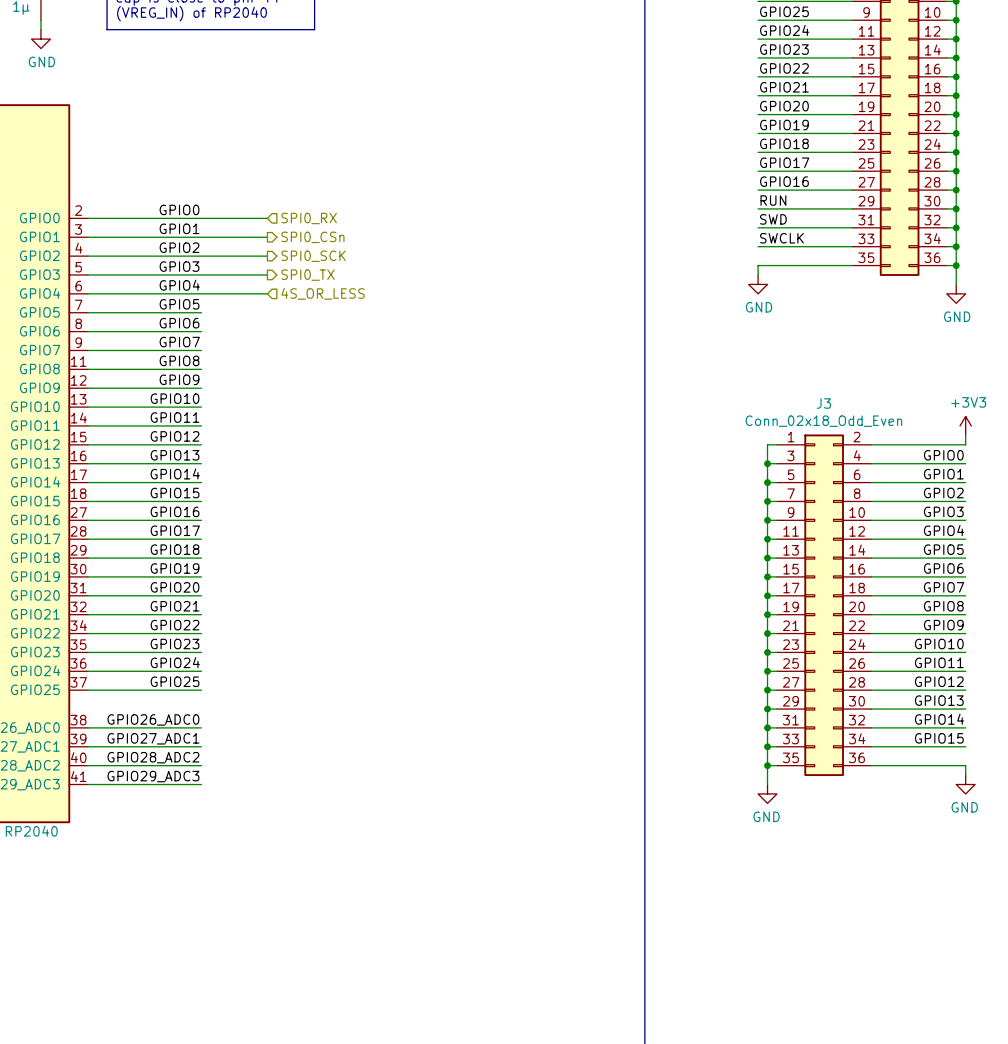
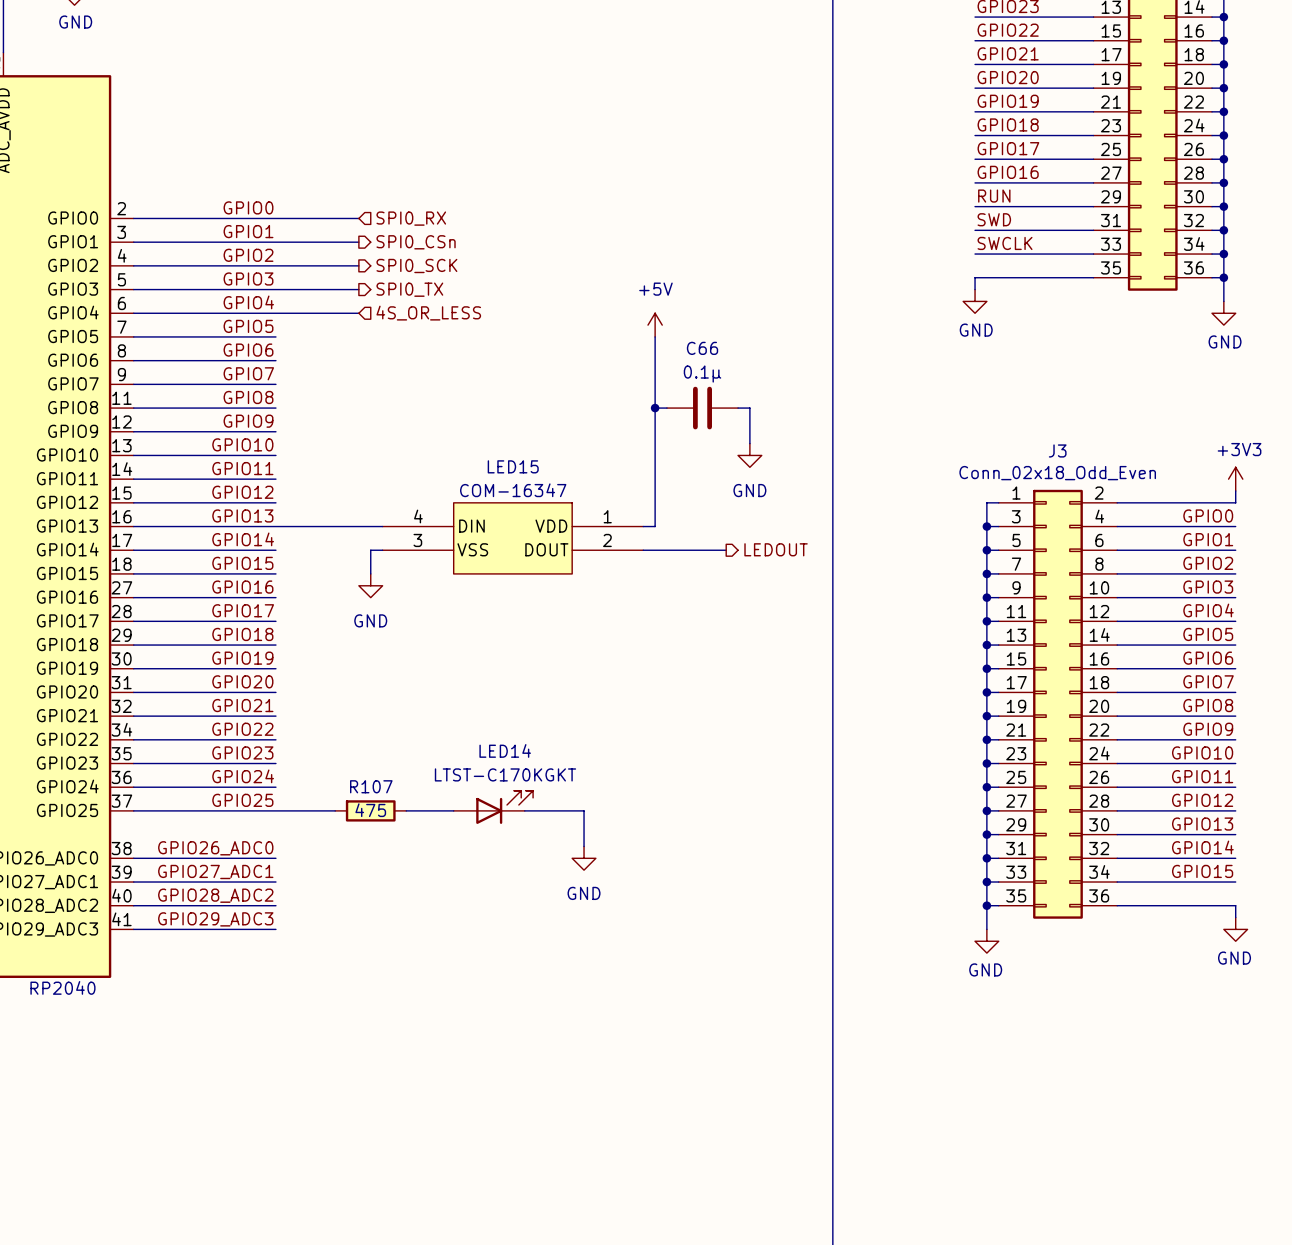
power symbol: none -> +5V (655, 325)
wire: none -> (655, 336) (655, 526) (643, 526)
wire: none -> (655, 408) (666, 408)
junction: none -> (655, 408)
C66: none -> 0.1µ (702, 408)
wire: none -> (738, 408) (749, 408) (749, 443)
power symbol: none -> GND (749, 455)
wire: none -> (275, 526) (382, 526)
LED15: none -> COM-16347 (512, 538)
wire: none -> (382, 550) (370, 550) (370, 573)
wire: none -> (643, 550) (726, 550)
hierarchical label: none -> LEDOUT (776, 549)
power symbol: none -> GND (370, 585)
LED14: none -> LTST-C170KGKT (493, 807)
wire: none -> (275, 810) (335, 810)
R107: none -> 475 (370, 810)
wire: none -> (406, 810) (453, 810)
wire: none -> (524, 810) (584, 810) (584, 846)
power symbol: none -> GND (584, 858)

